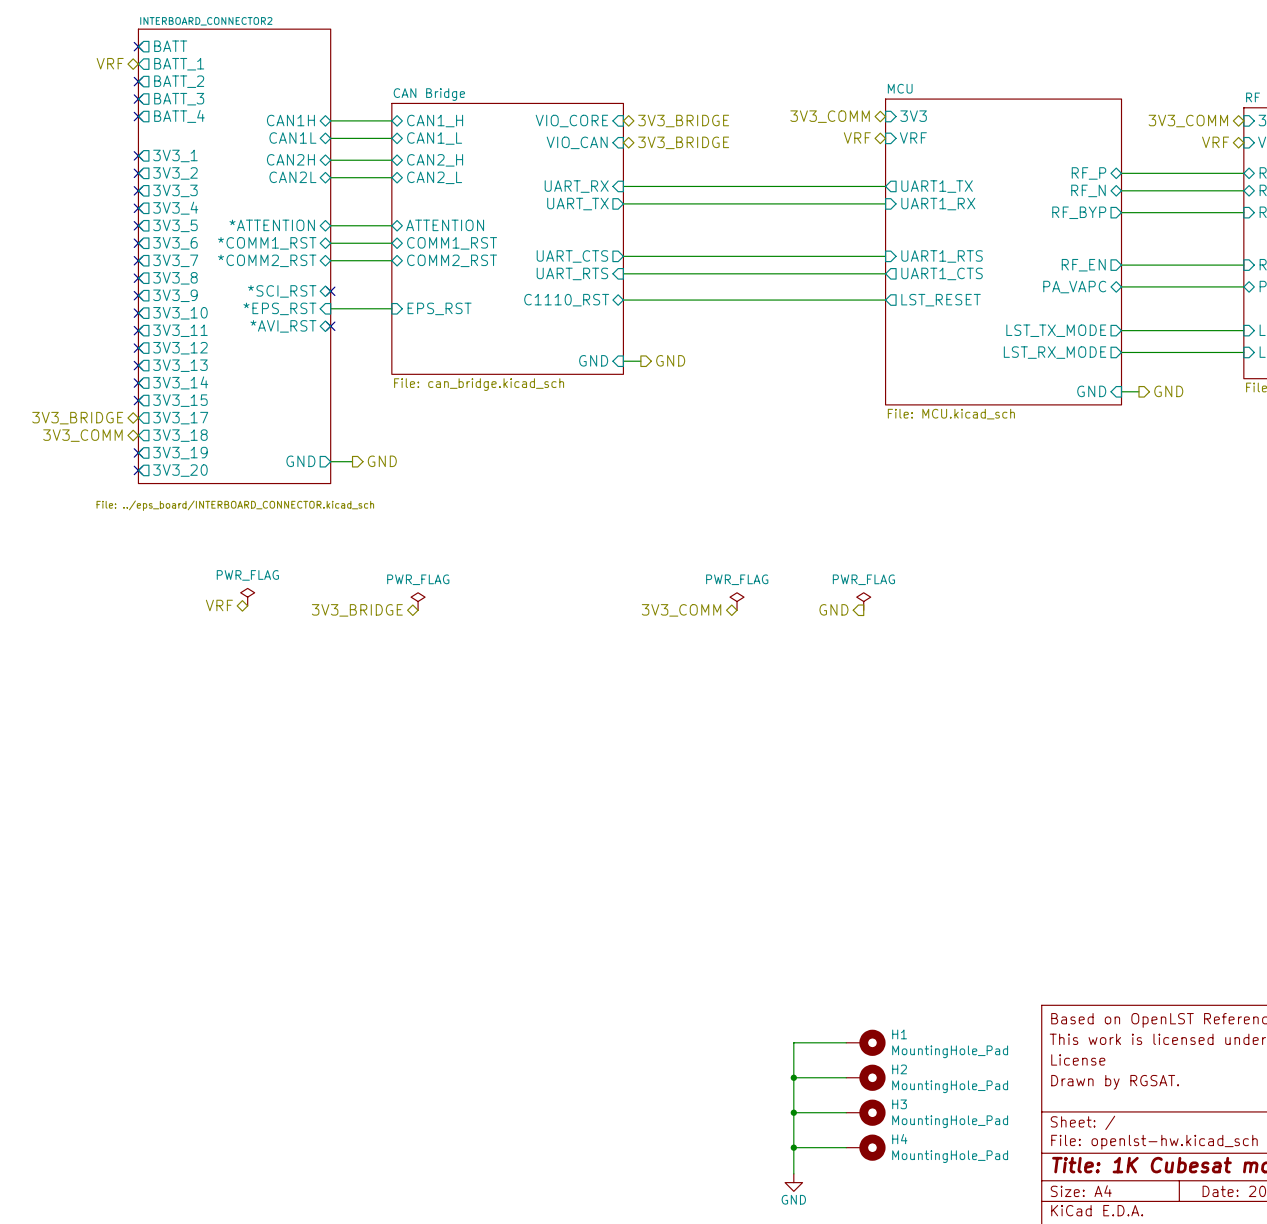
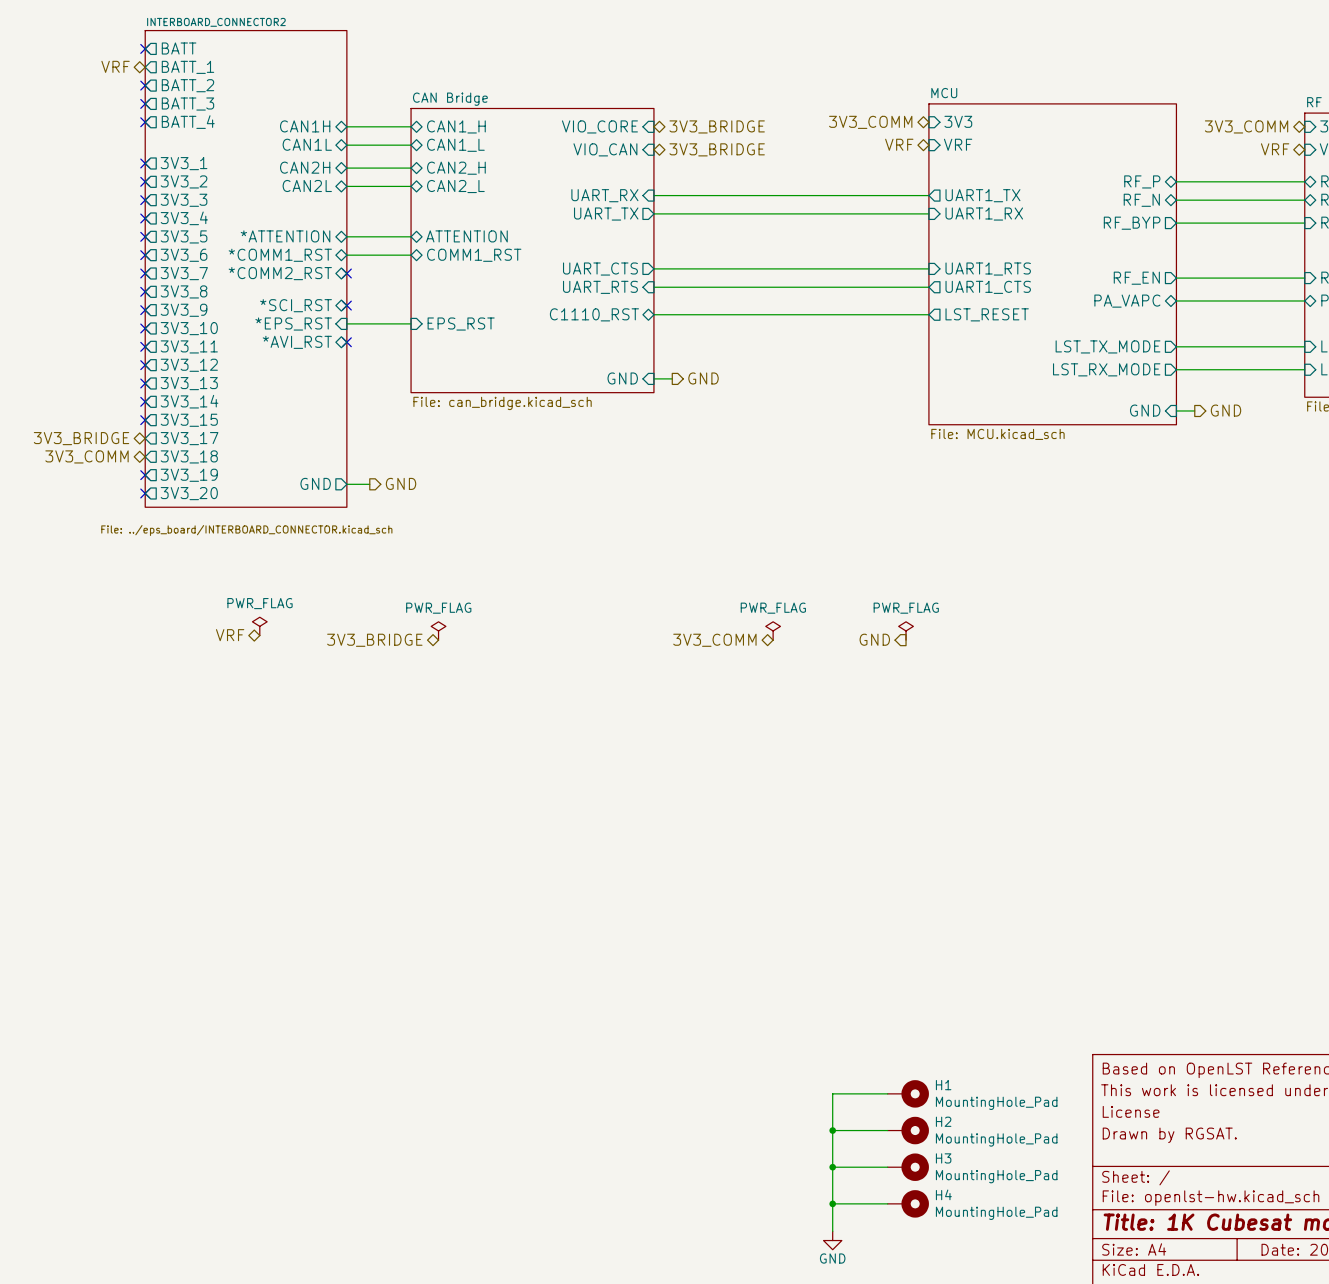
wire: (330, 260) (391, 260) -> none
no-connect mark: none -> (346, 273)
sheet pin: COMM2_RST (452, 260) -> none

